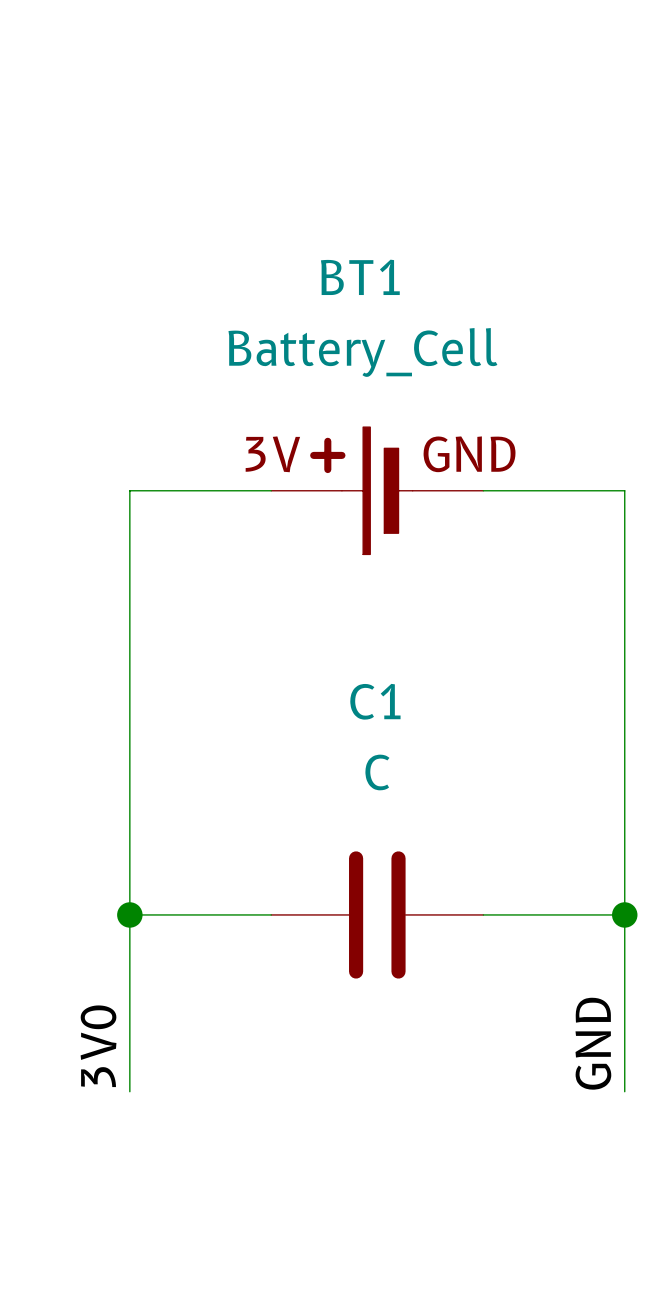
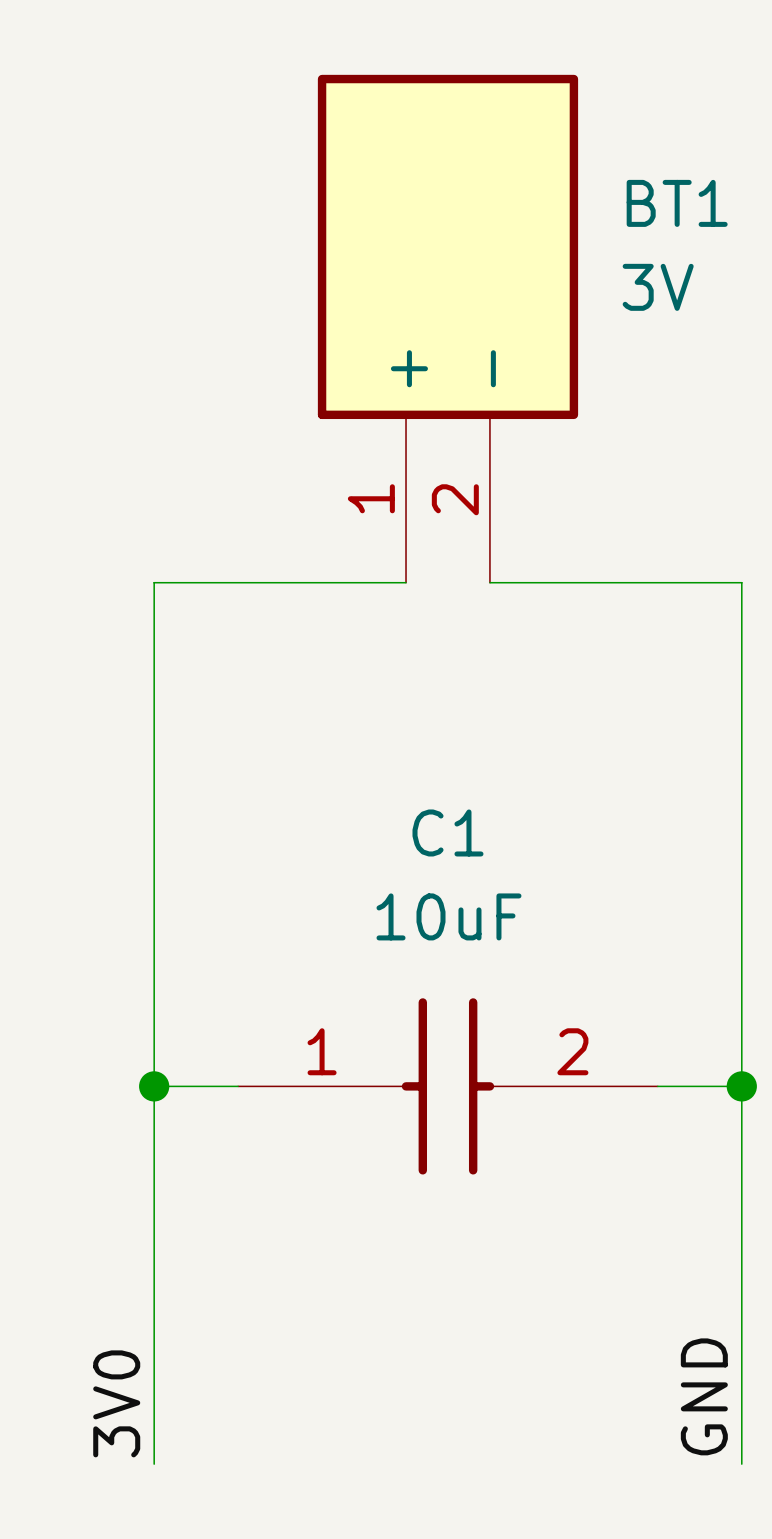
BT1 name position: BT1 (360, 277) -> BT1 (677, 203)
BT1 value: Battery_Cell (362, 352) -> 3V (658, 287)
BT1 symbol: [271, 427, 484, 555] -> [317, 74, 579, 583]
C1 value: C (377, 772) -> 10uF (448, 916)
C1 symbol: [271, 851, 484, 979] -> [238, 998, 658, 1175]
label position: GND (593, 1043) -> GND (704, 1396)
label position: 3V0 (98, 1046) -> 3V0 (116, 1403)
wire: none -> (154, 1296) (154, 1464)
wire: none -> (741, 1296) (741, 1464)

